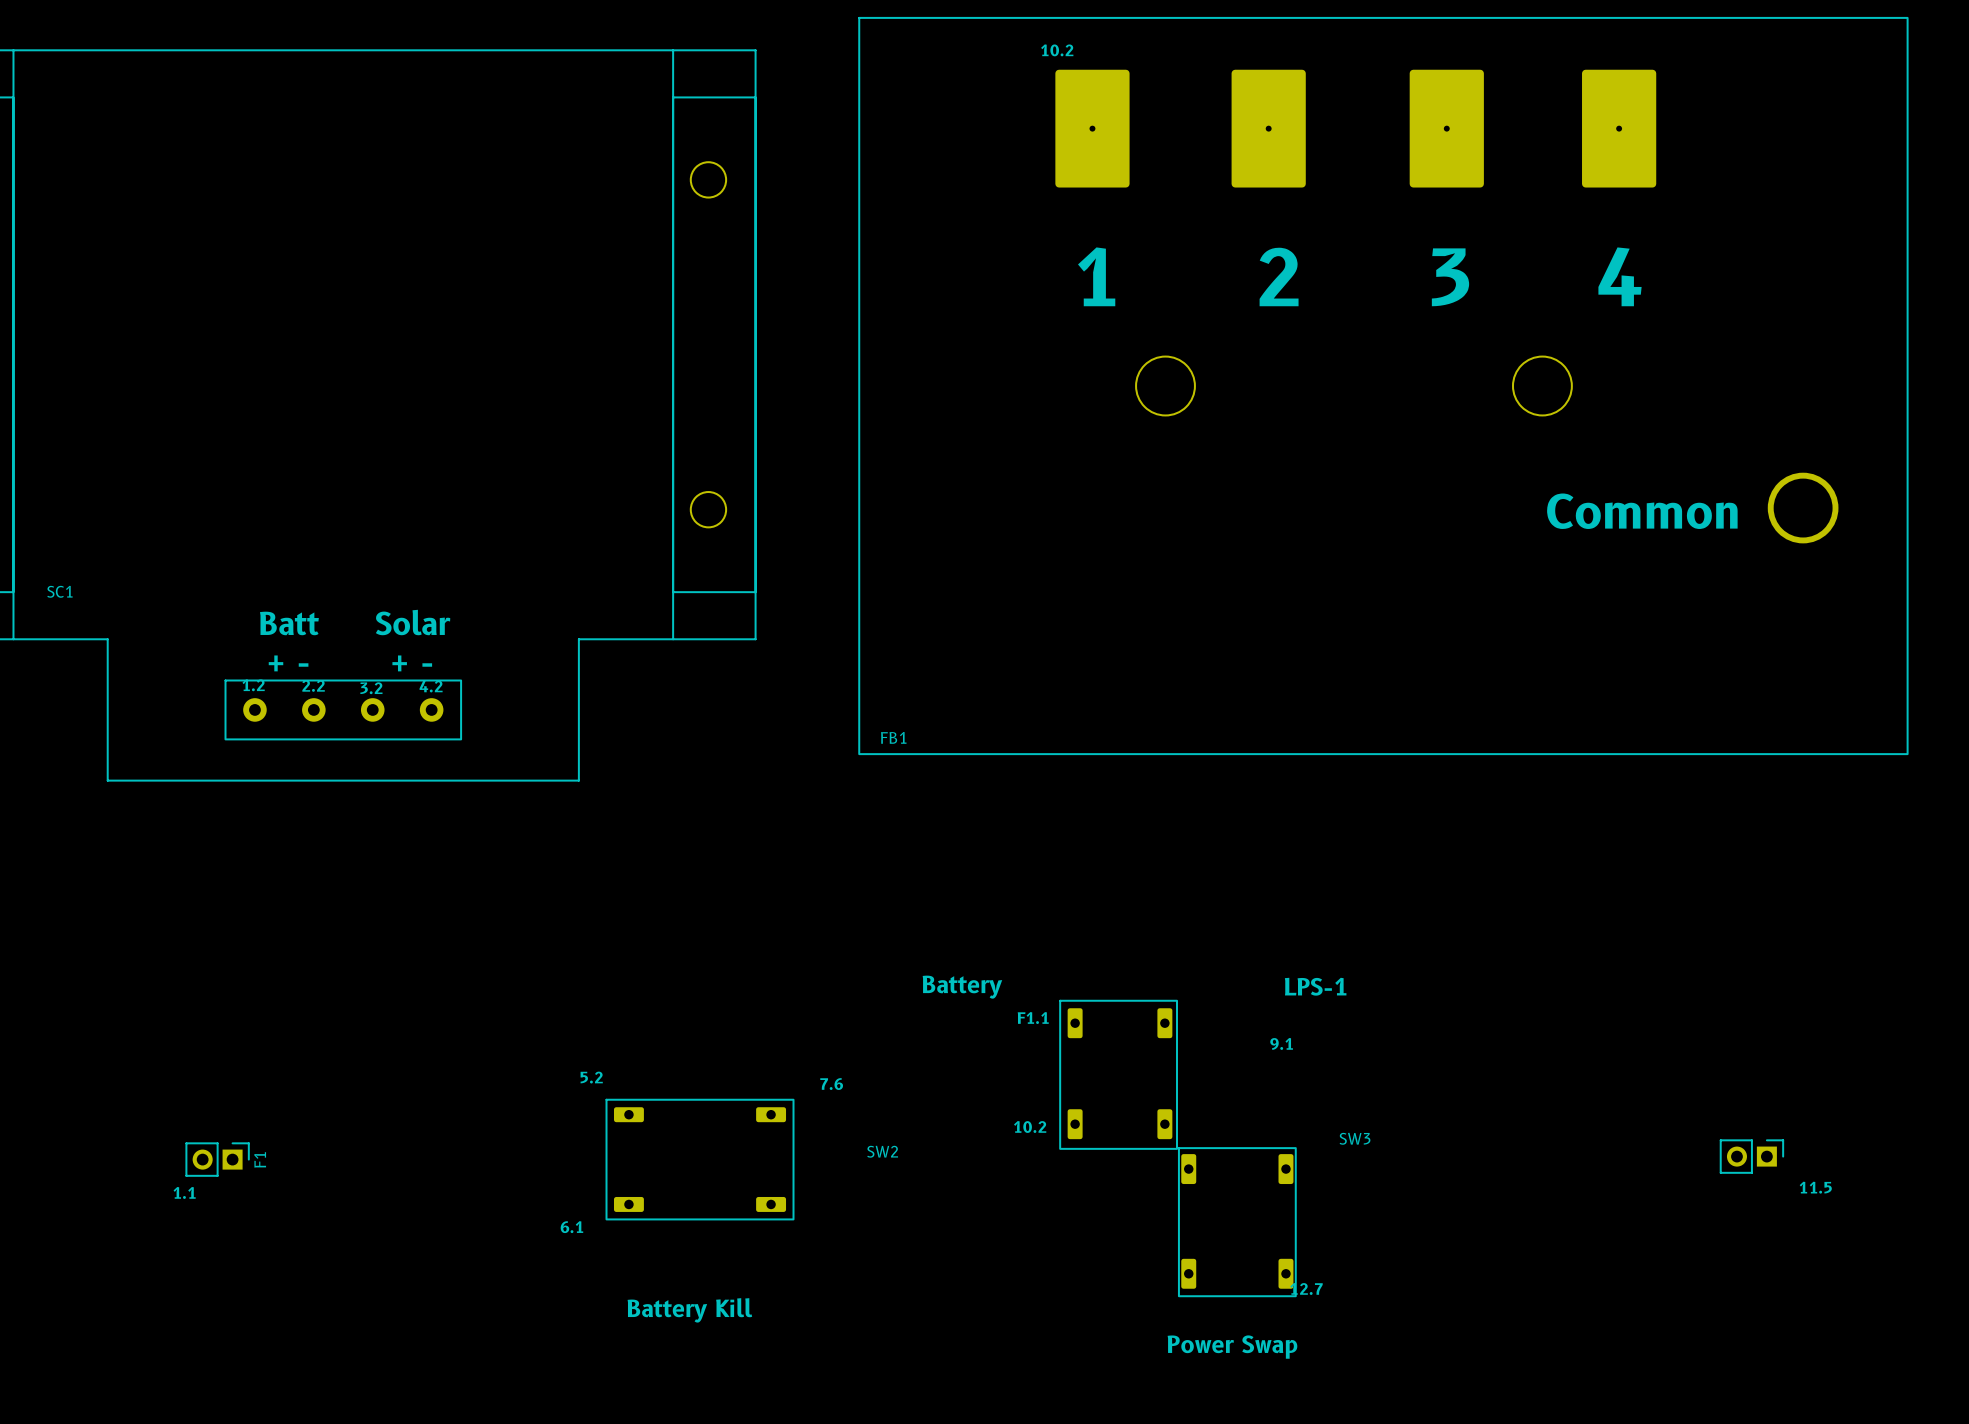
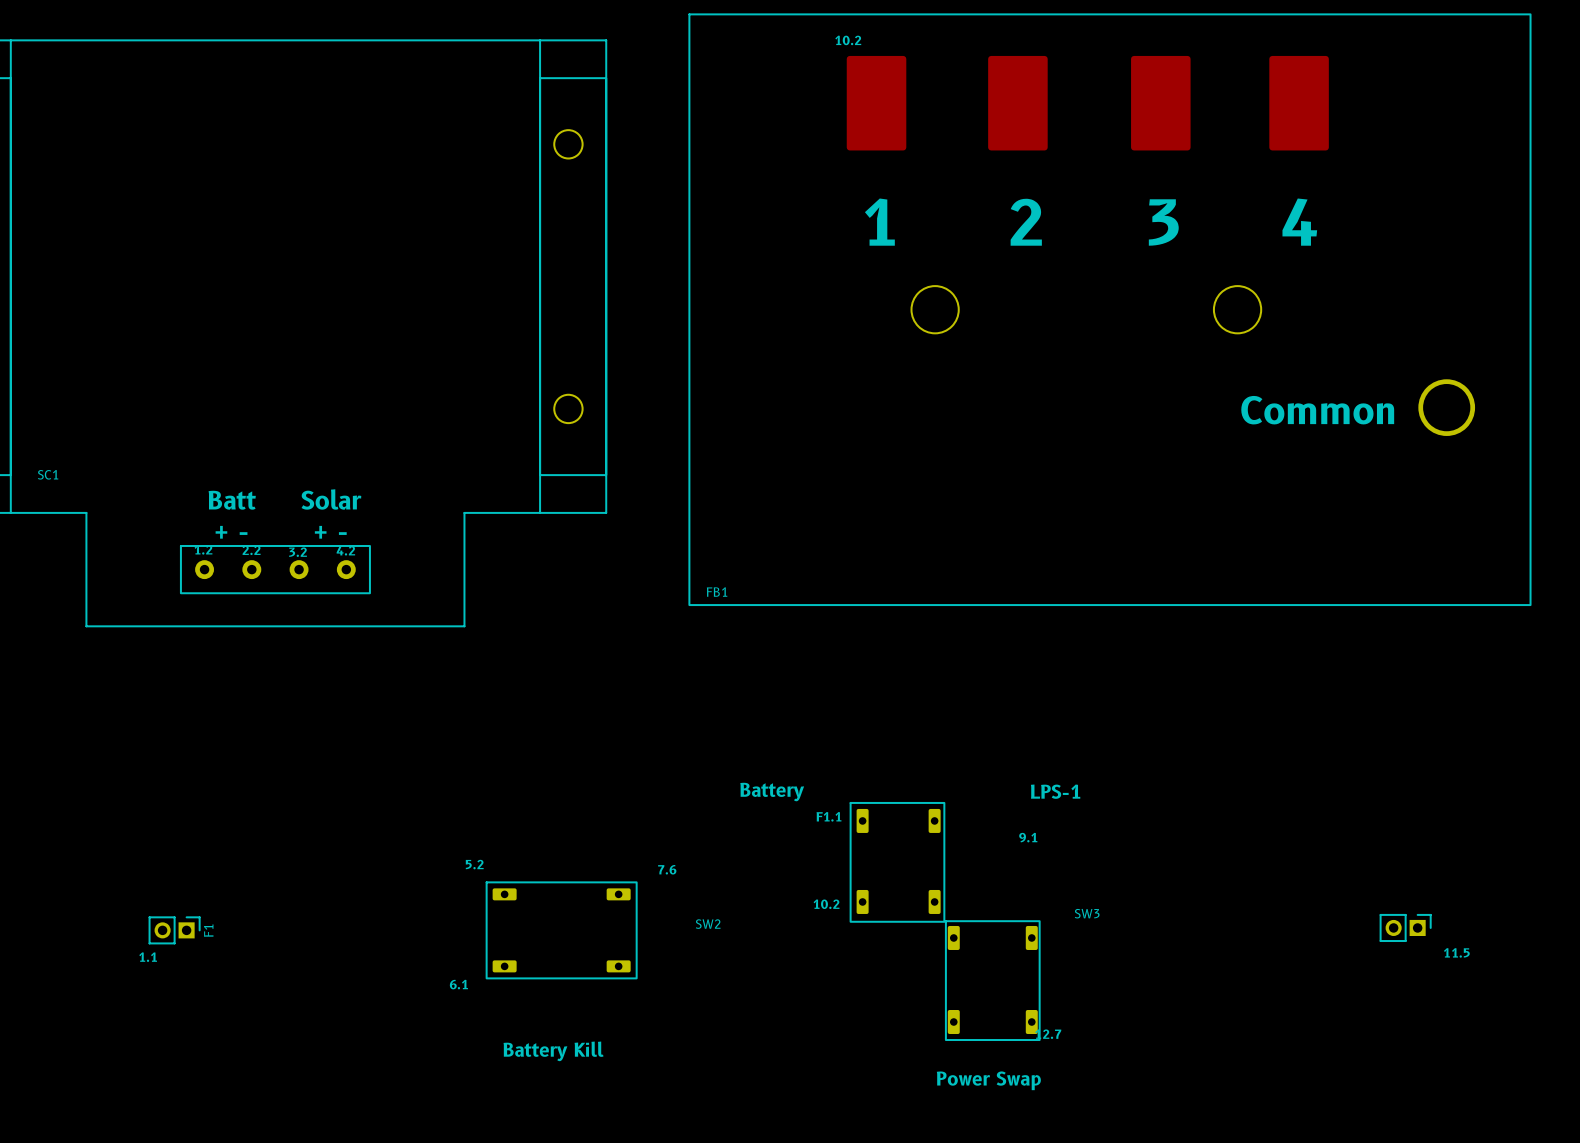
FB1 footprint: [858, 17, 1909, 756] -> [688, 13, 1532, 606]

